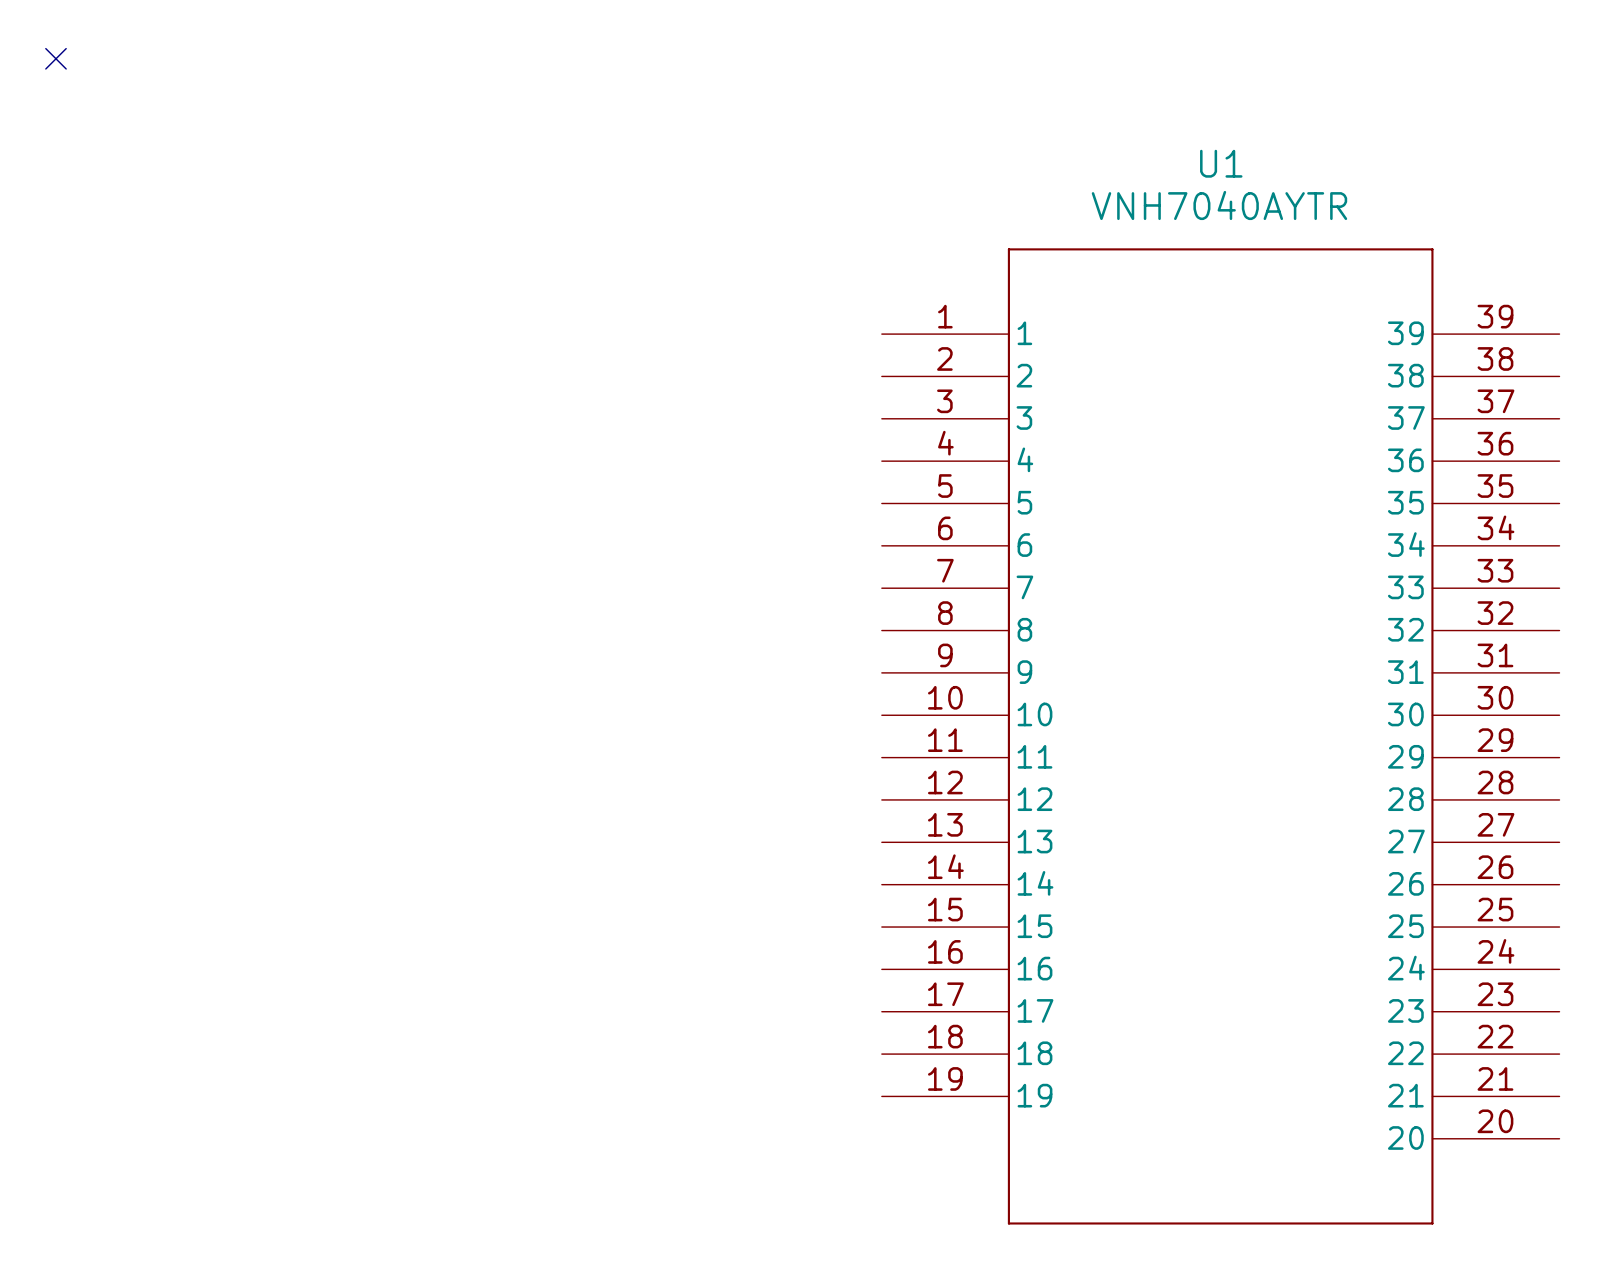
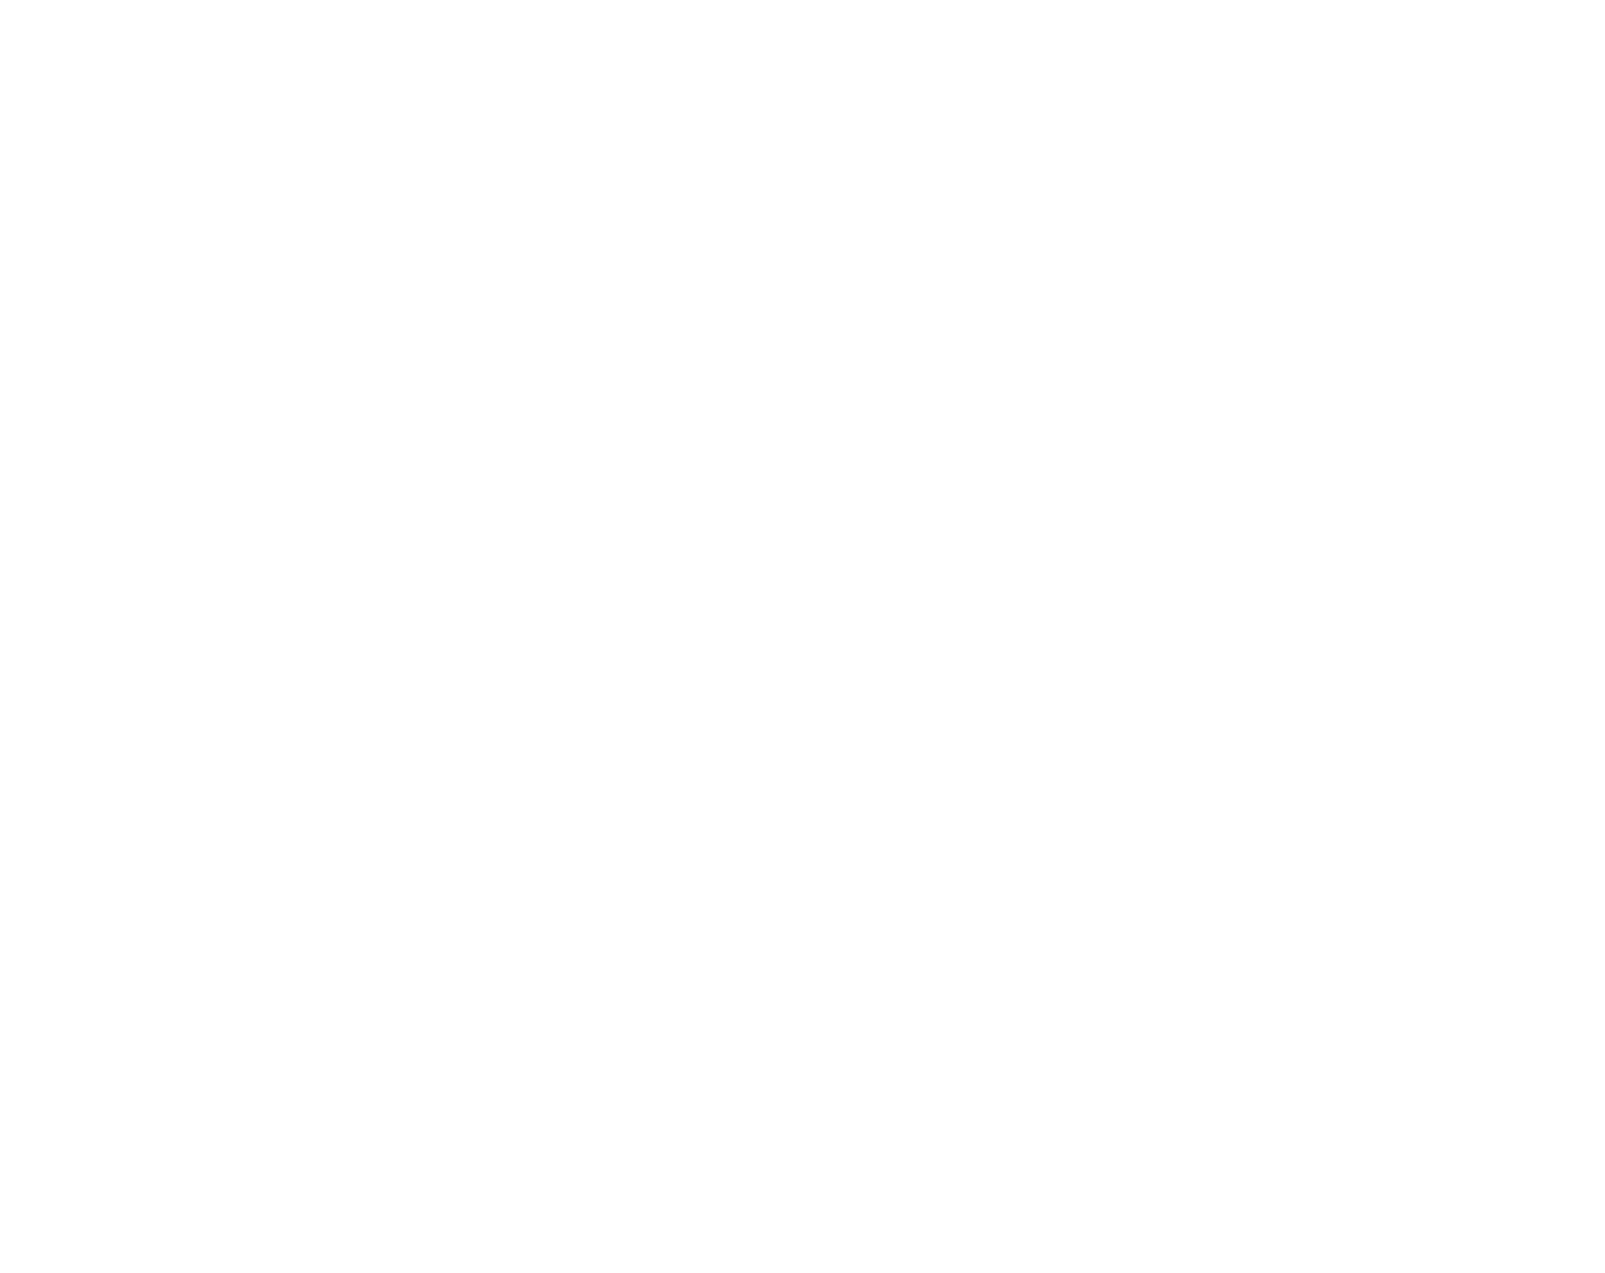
no-connect mark: (55, 58) -> none
U1: VNH7040AYTR (1220, 736) -> none

